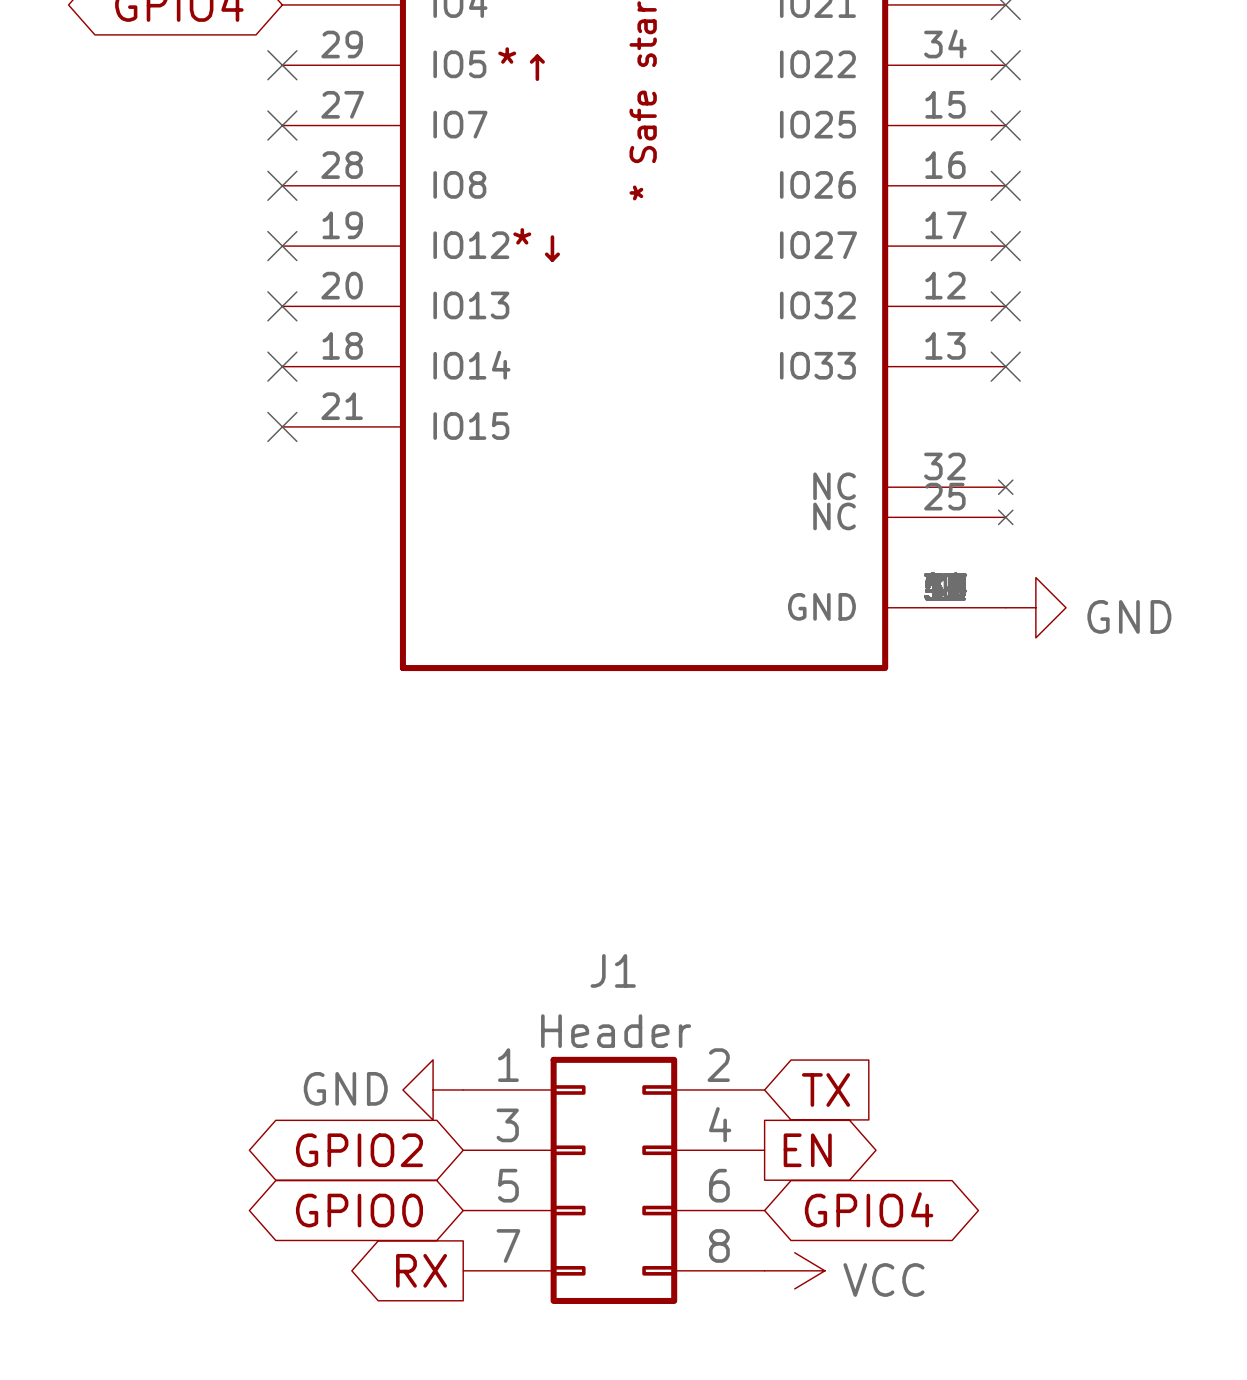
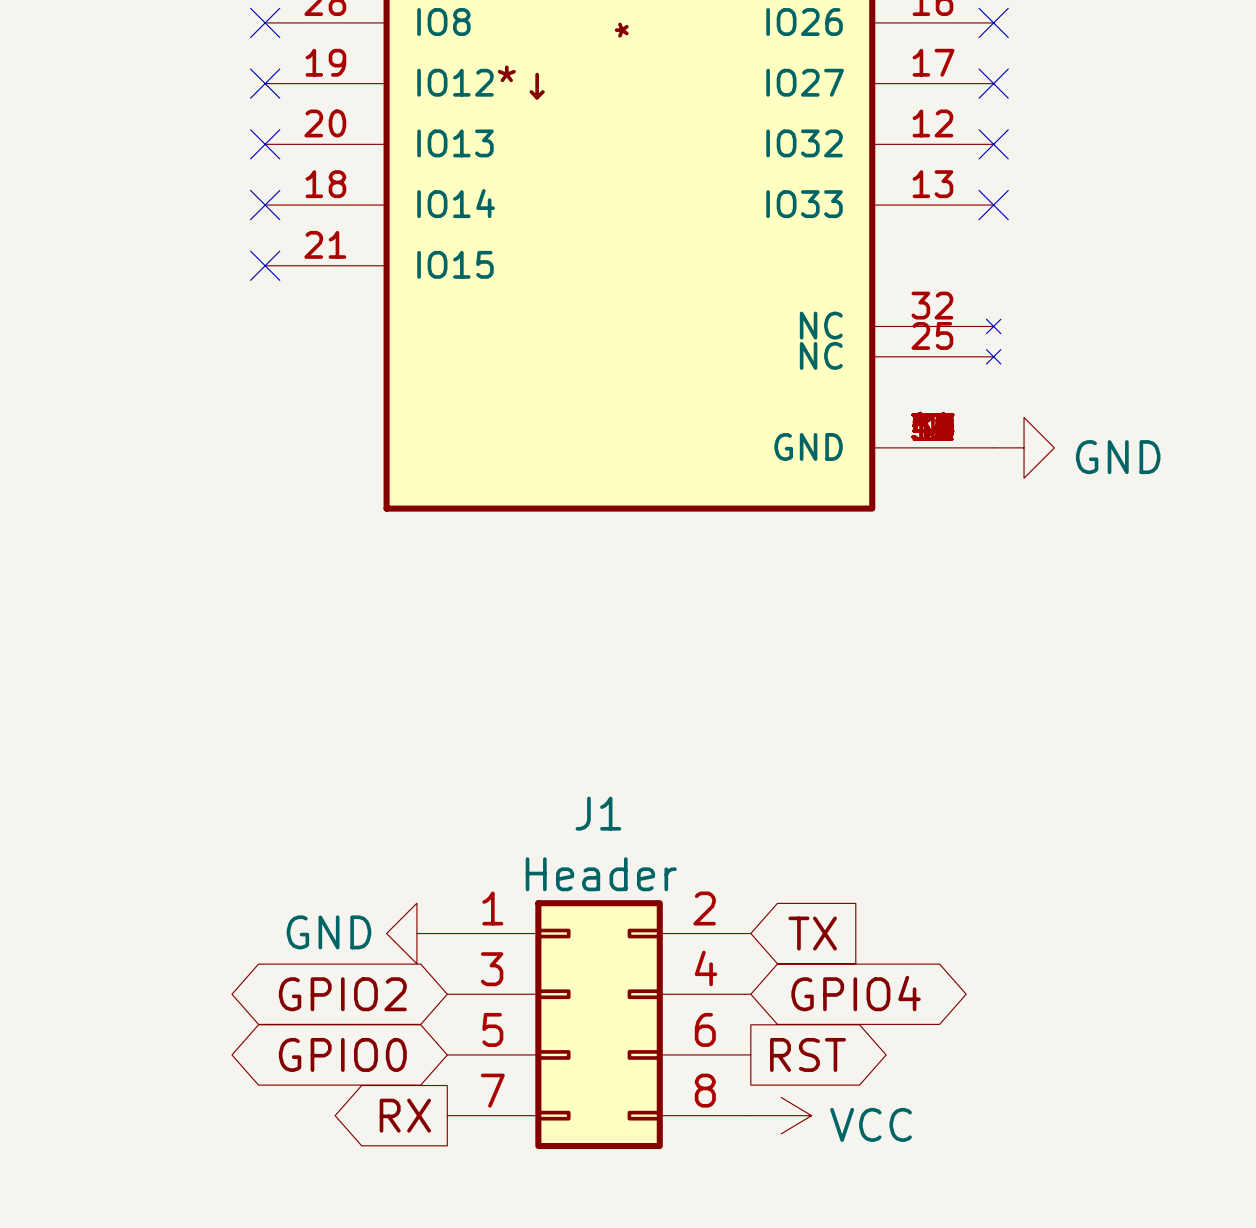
global label shape: output (807, 1150) -> bidirectional (856, 993)
global label: EN (807, 1150) -> GPIO4 (856, 993)
global label shape: bidirectional (869, 1209) -> output (807, 1054)
global label: GPIO4 (869, 1209) -> RST (807, 1054)

